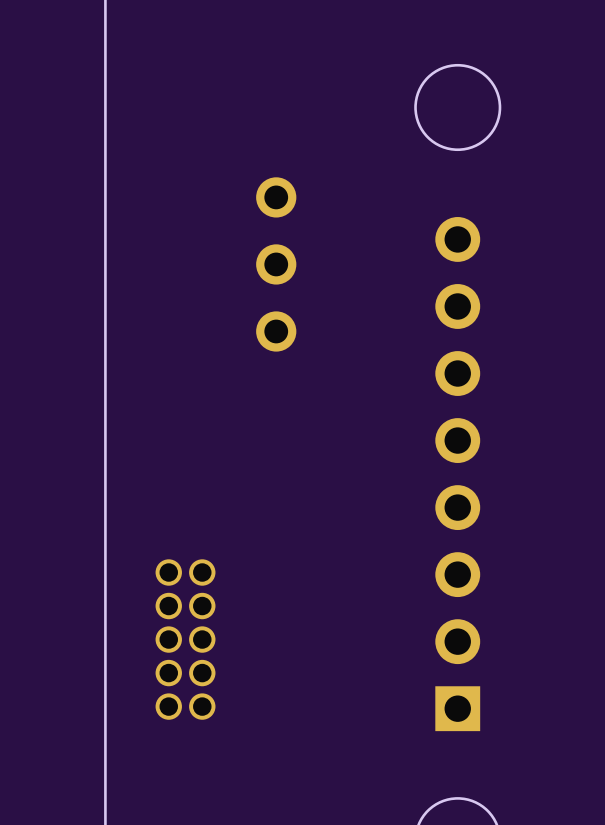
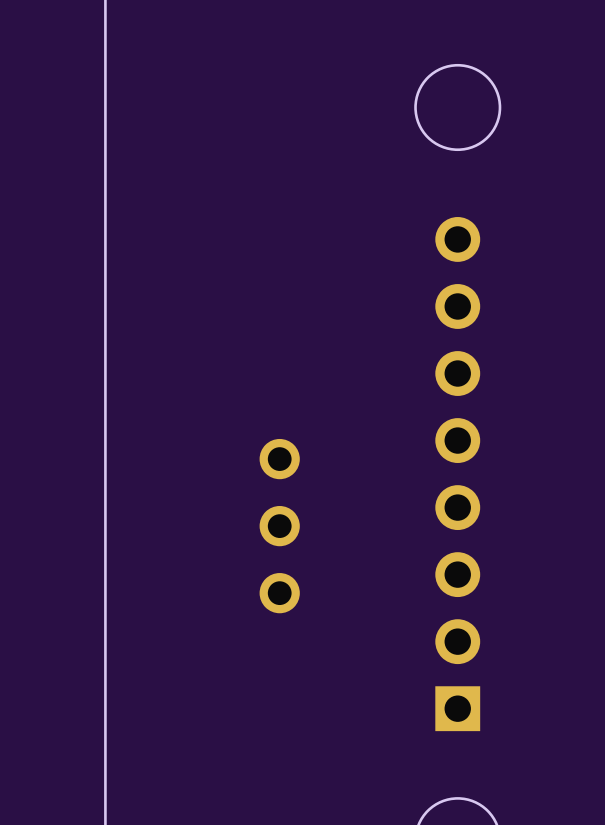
part position: (276, 264) -> (279, 526)
part: (185, 639) -> none

